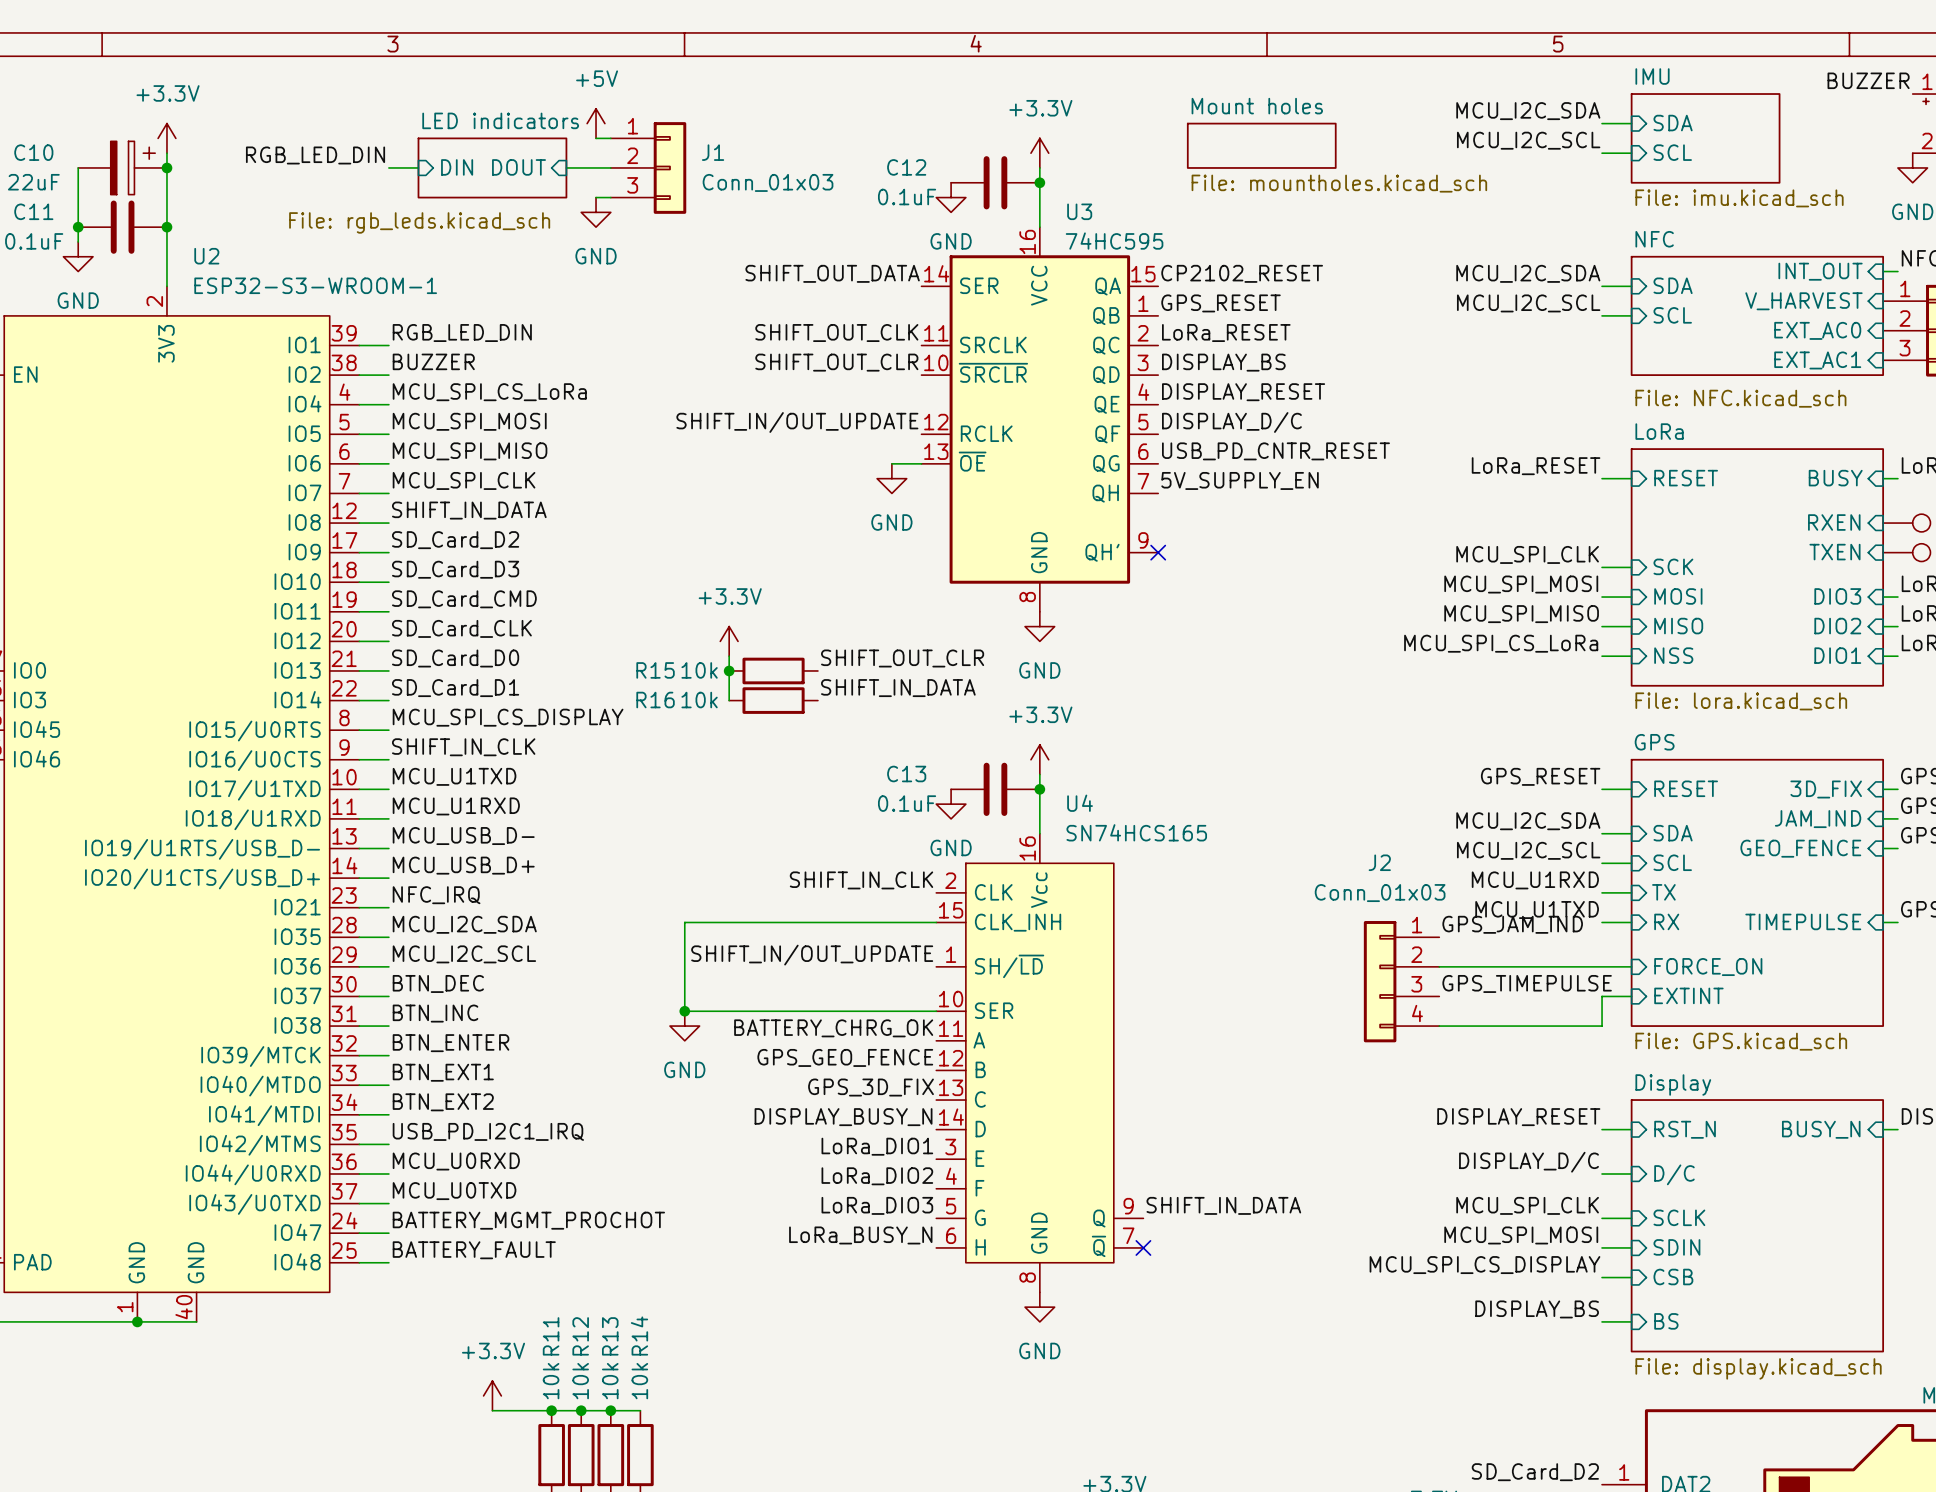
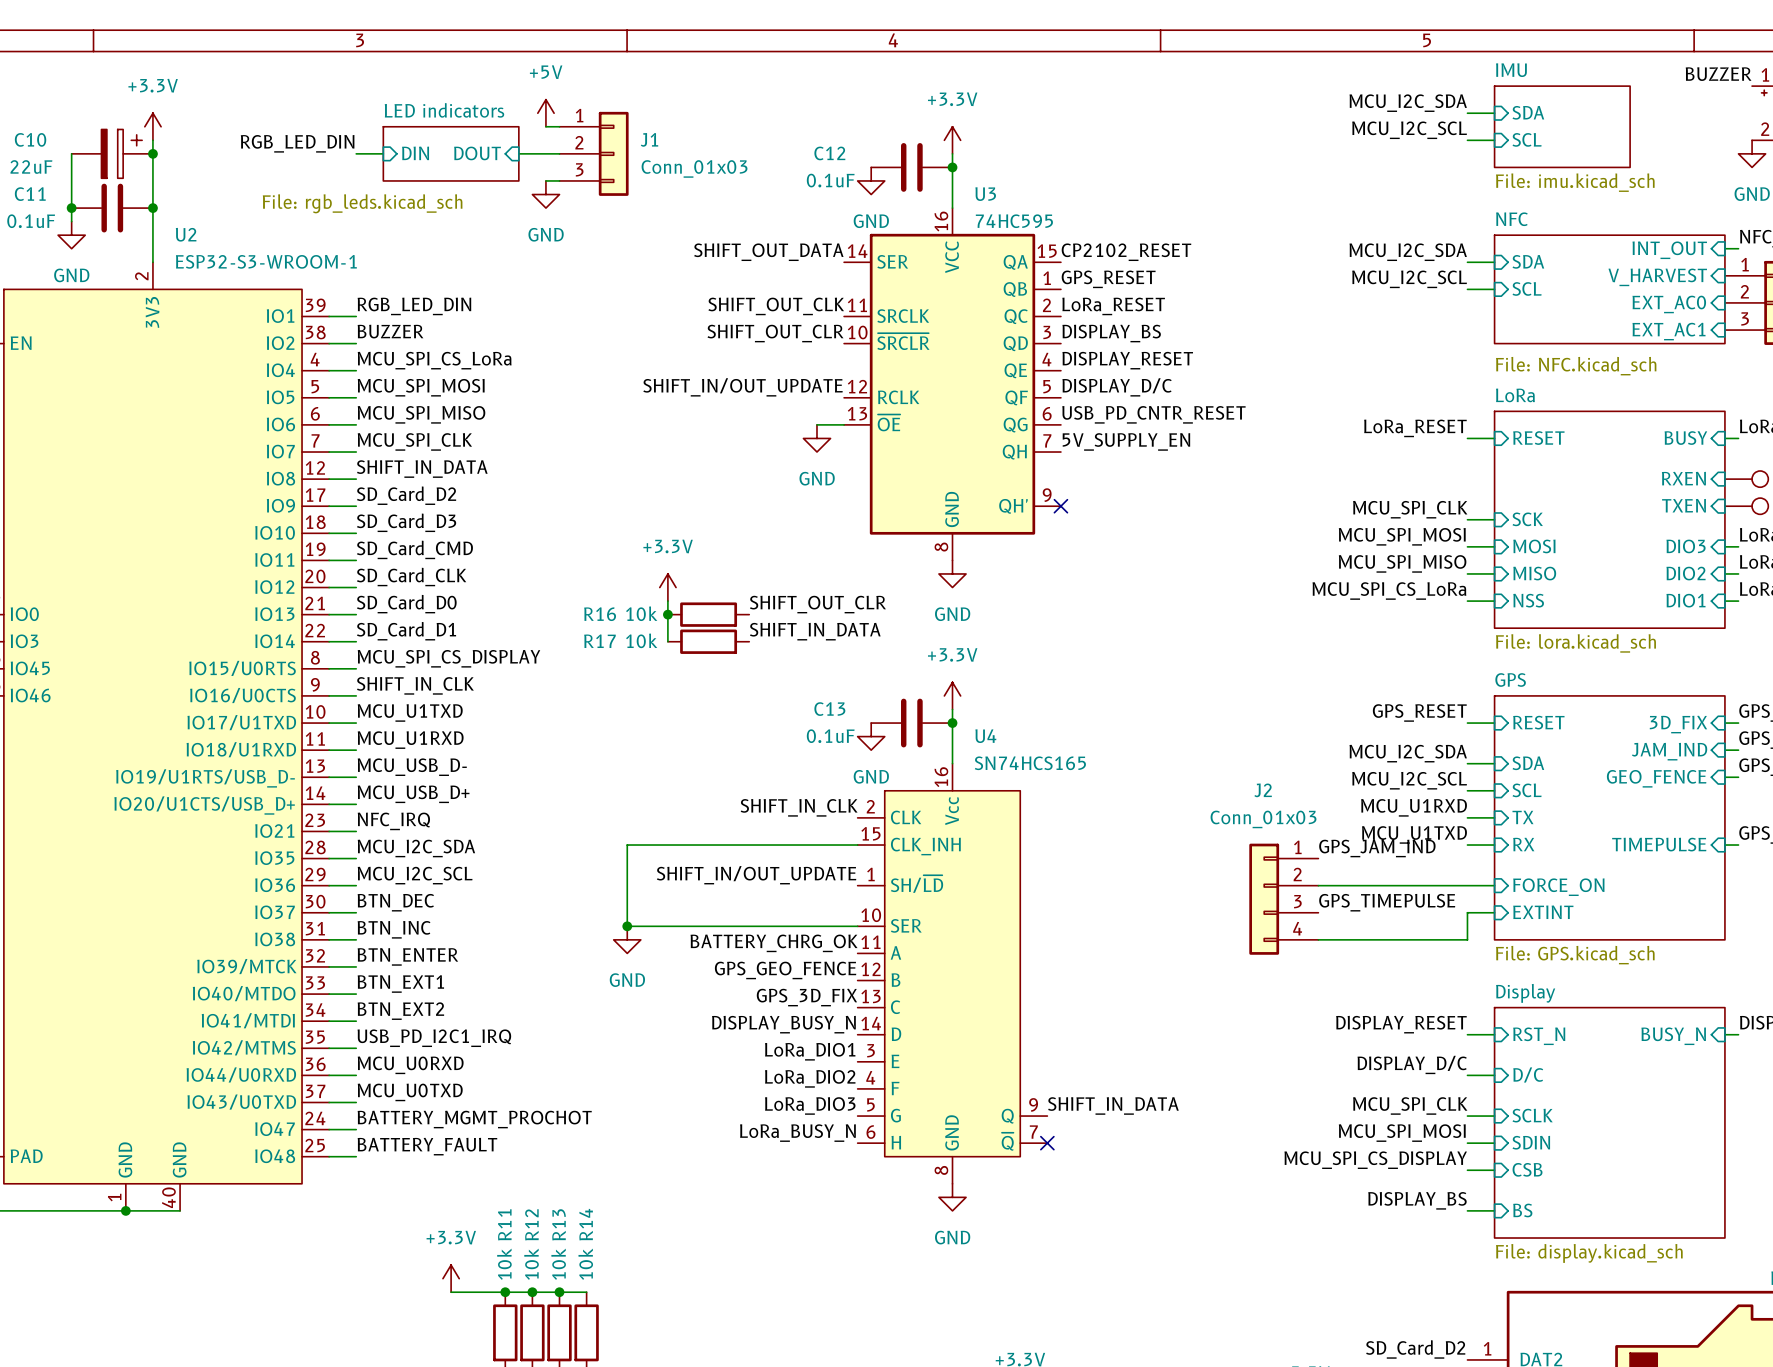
sheet Mount holes: File: mountholes.kicad_sch (1261, 145) -> none
R15 name: R15 (655, 670) -> R16 (600, 614)
R16 name: R16 (655, 700) -> R17 (599, 641)

